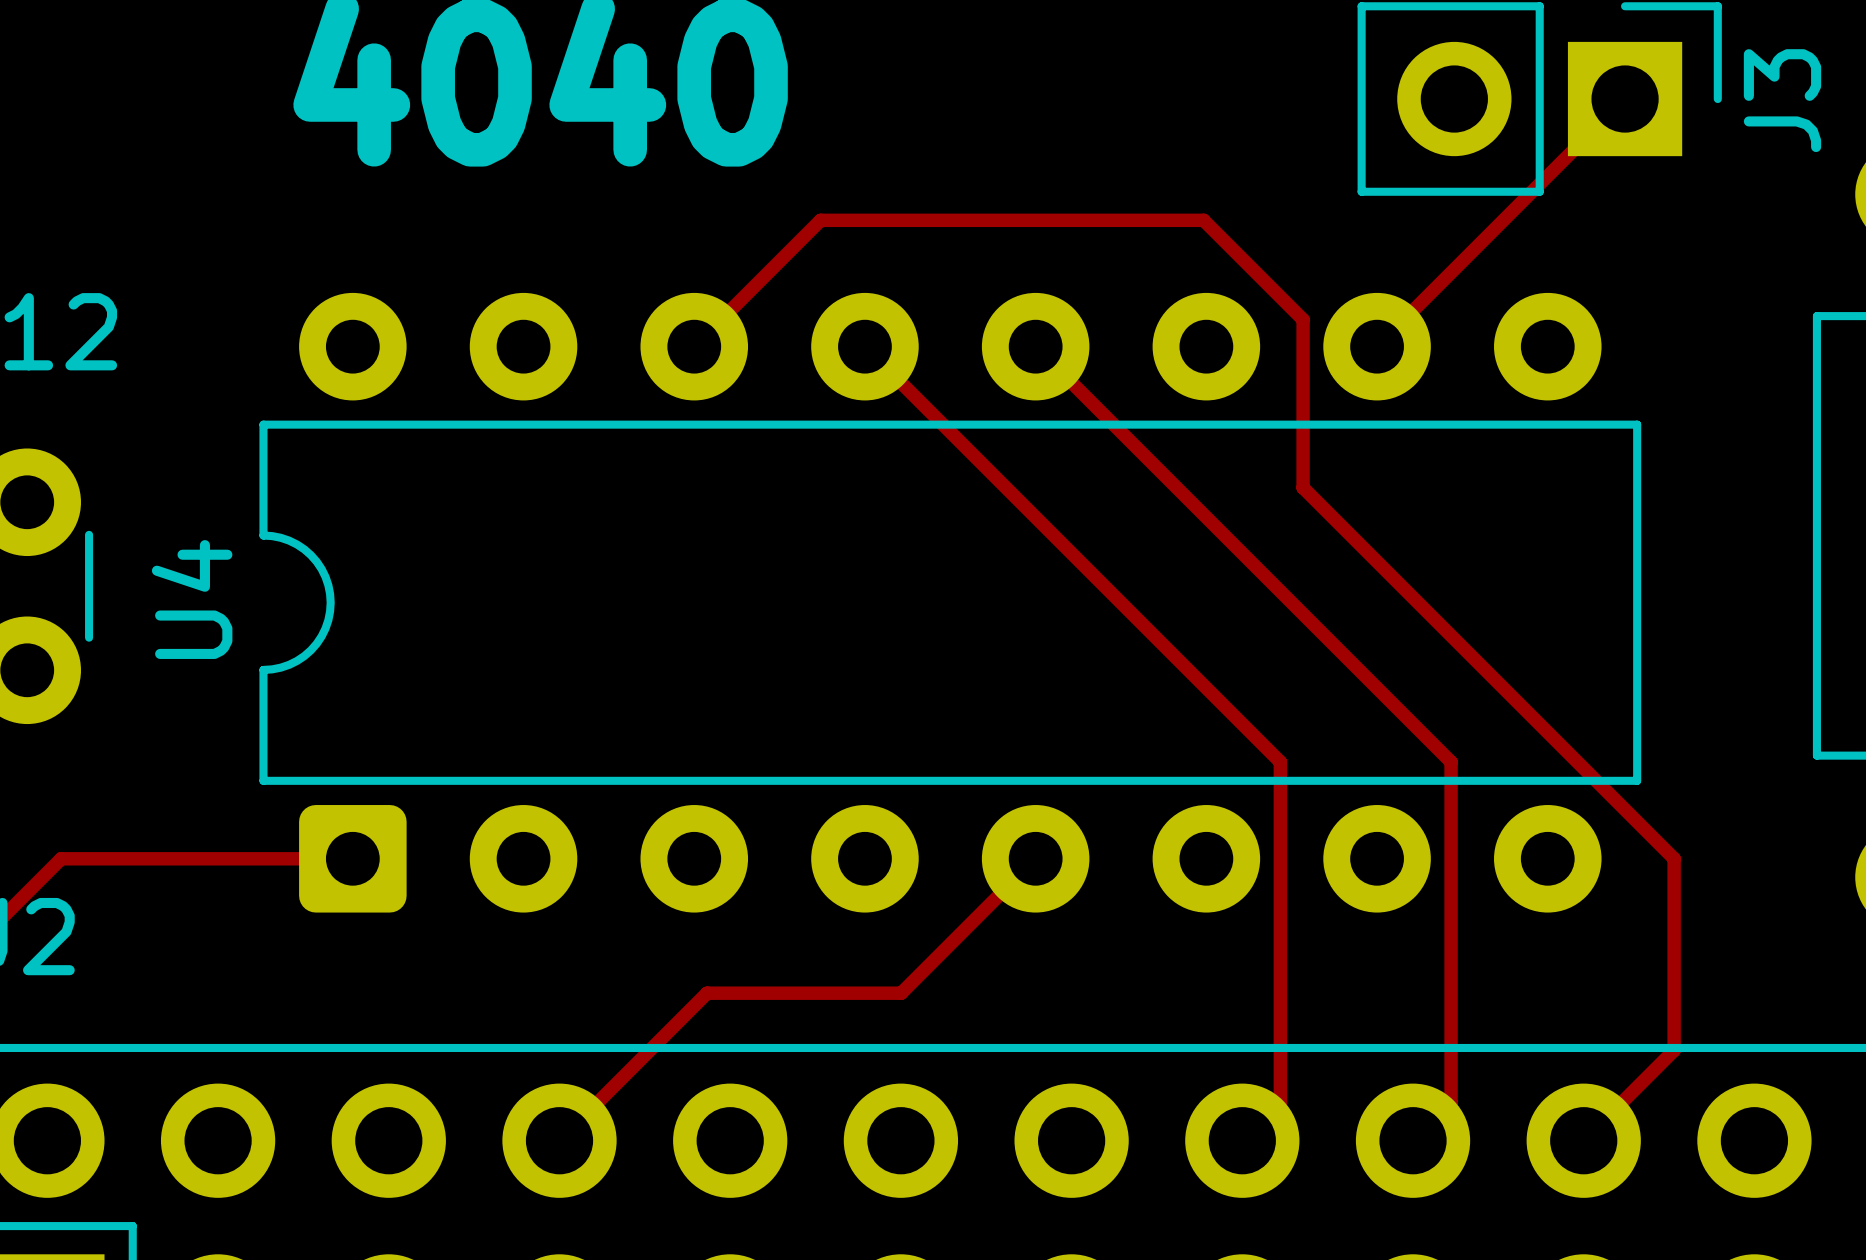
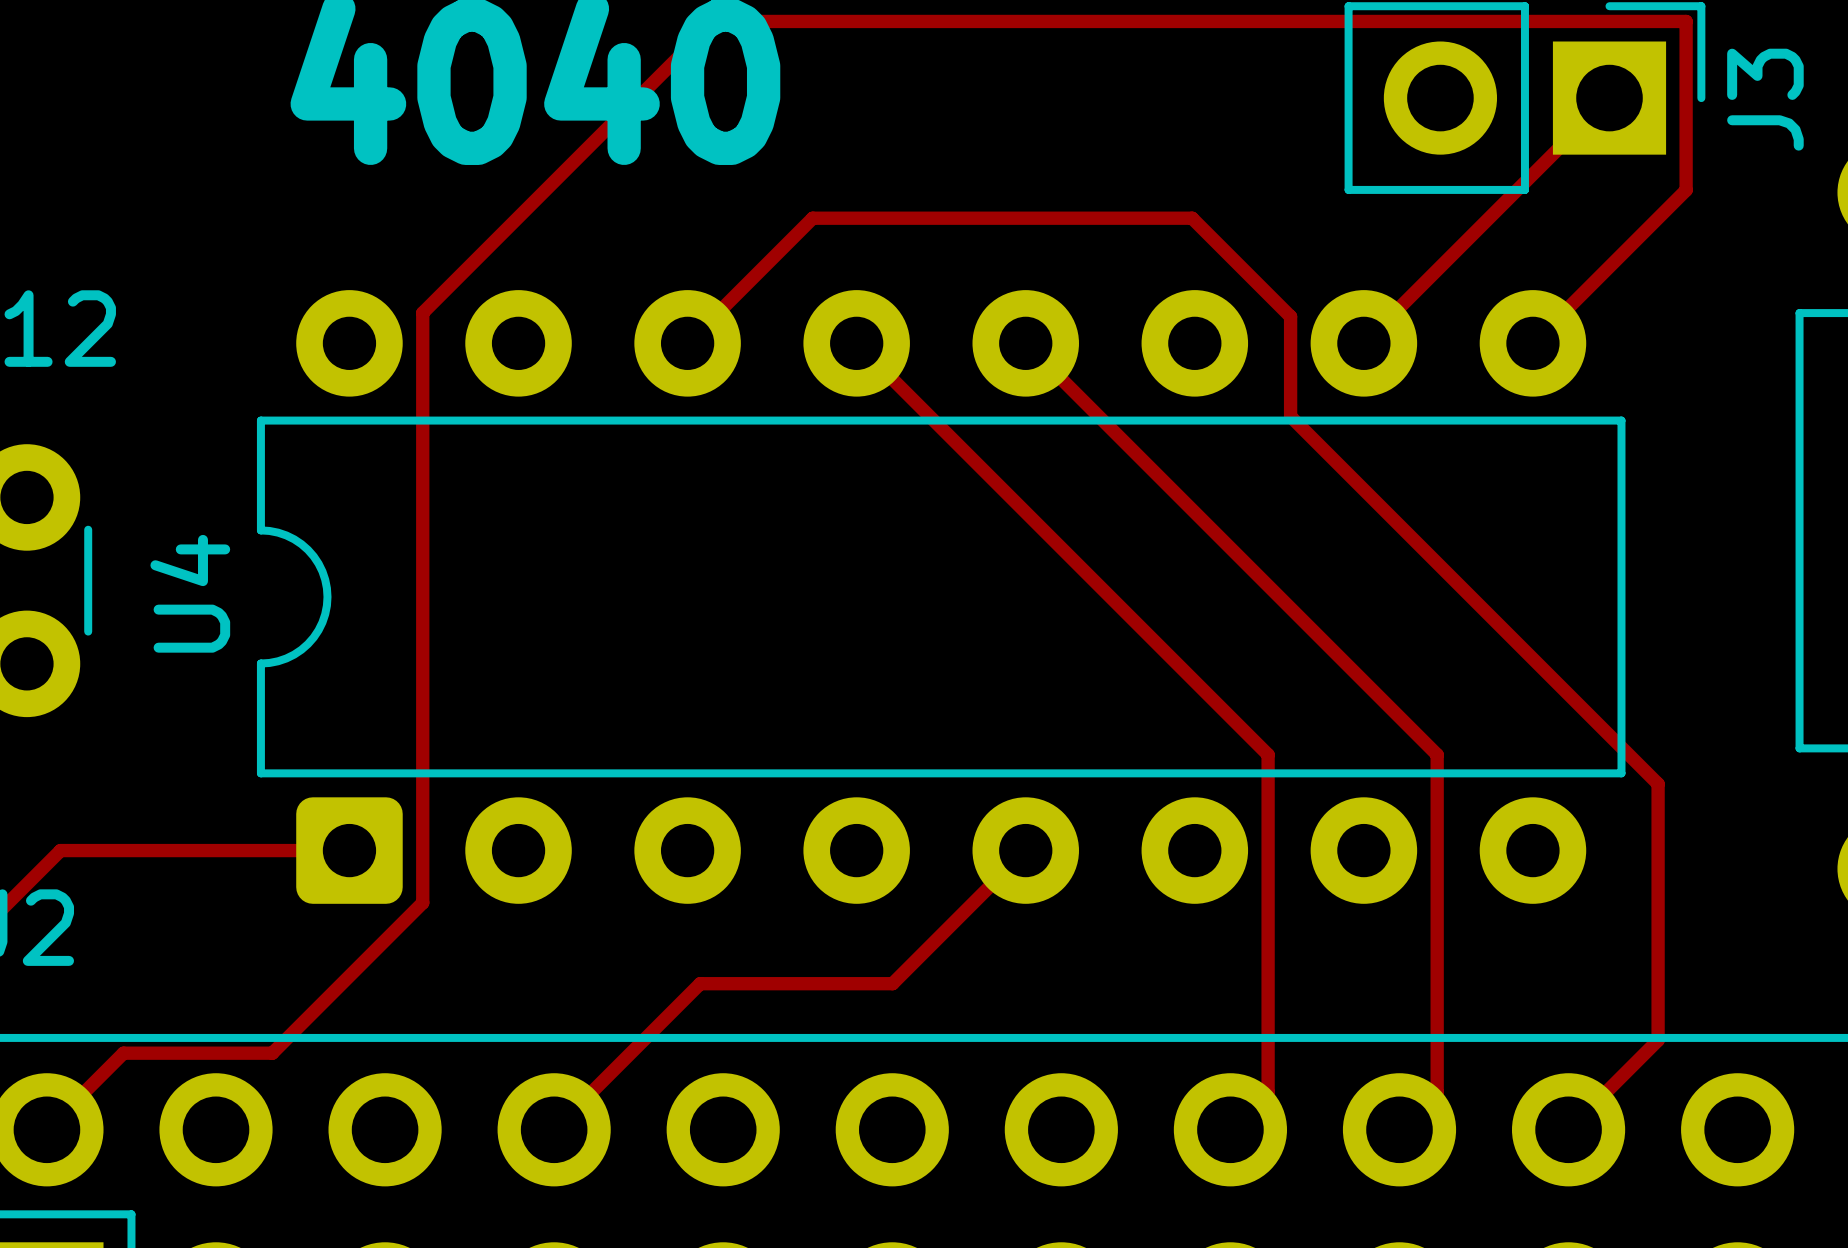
track: none -> (1532, 343) (1686, 190) (1686, 21) (714, 21) (422, 313) (422, 902) (272, 1053) (123, 1053) (46, 1129)
track: (1303, 420) (1303, 487) (1674, 858) -> (1290, 416) (1658, 784) (1658, 850)

